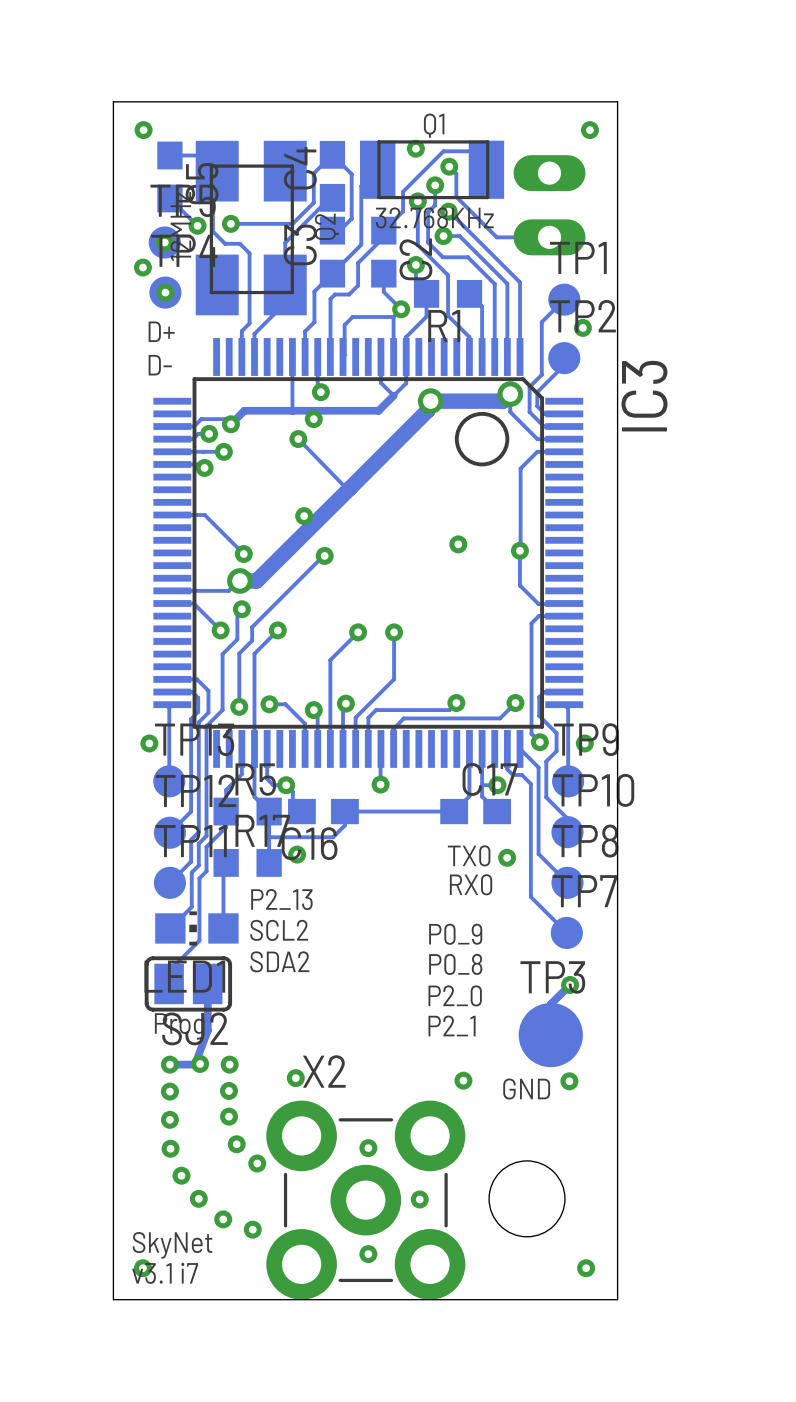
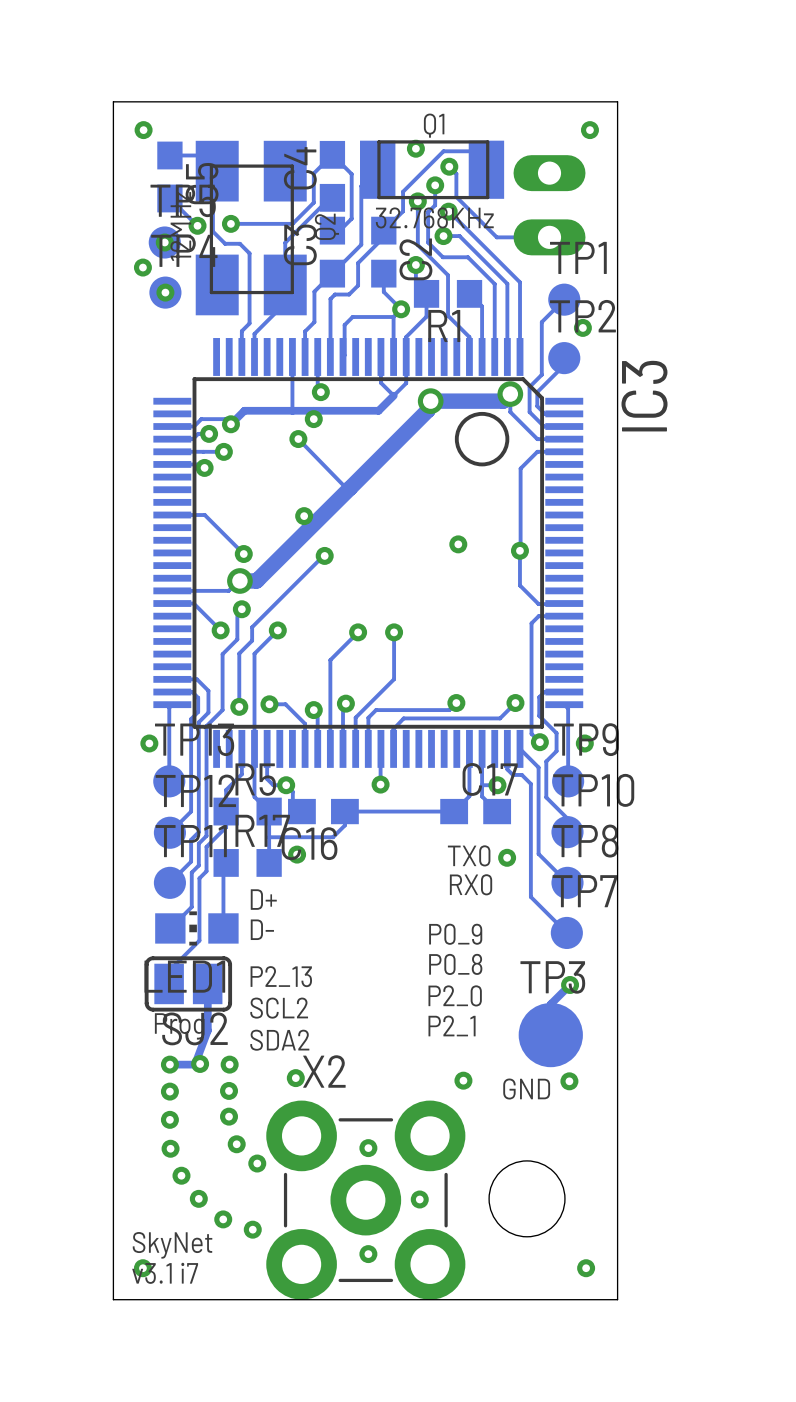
text: D+ (161, 331) -> none
text: D- (160, 365) -> none
text: P2_13 (281, 899) -> D+ (263, 899)
text: SCL2 (279, 930) -> D- (262, 929)
text position: SDA2 (279, 961) -> SDA2 (279, 1040)
text: none -> P2_13 (281, 976)
text: none -> SCL2 (279, 1008)

